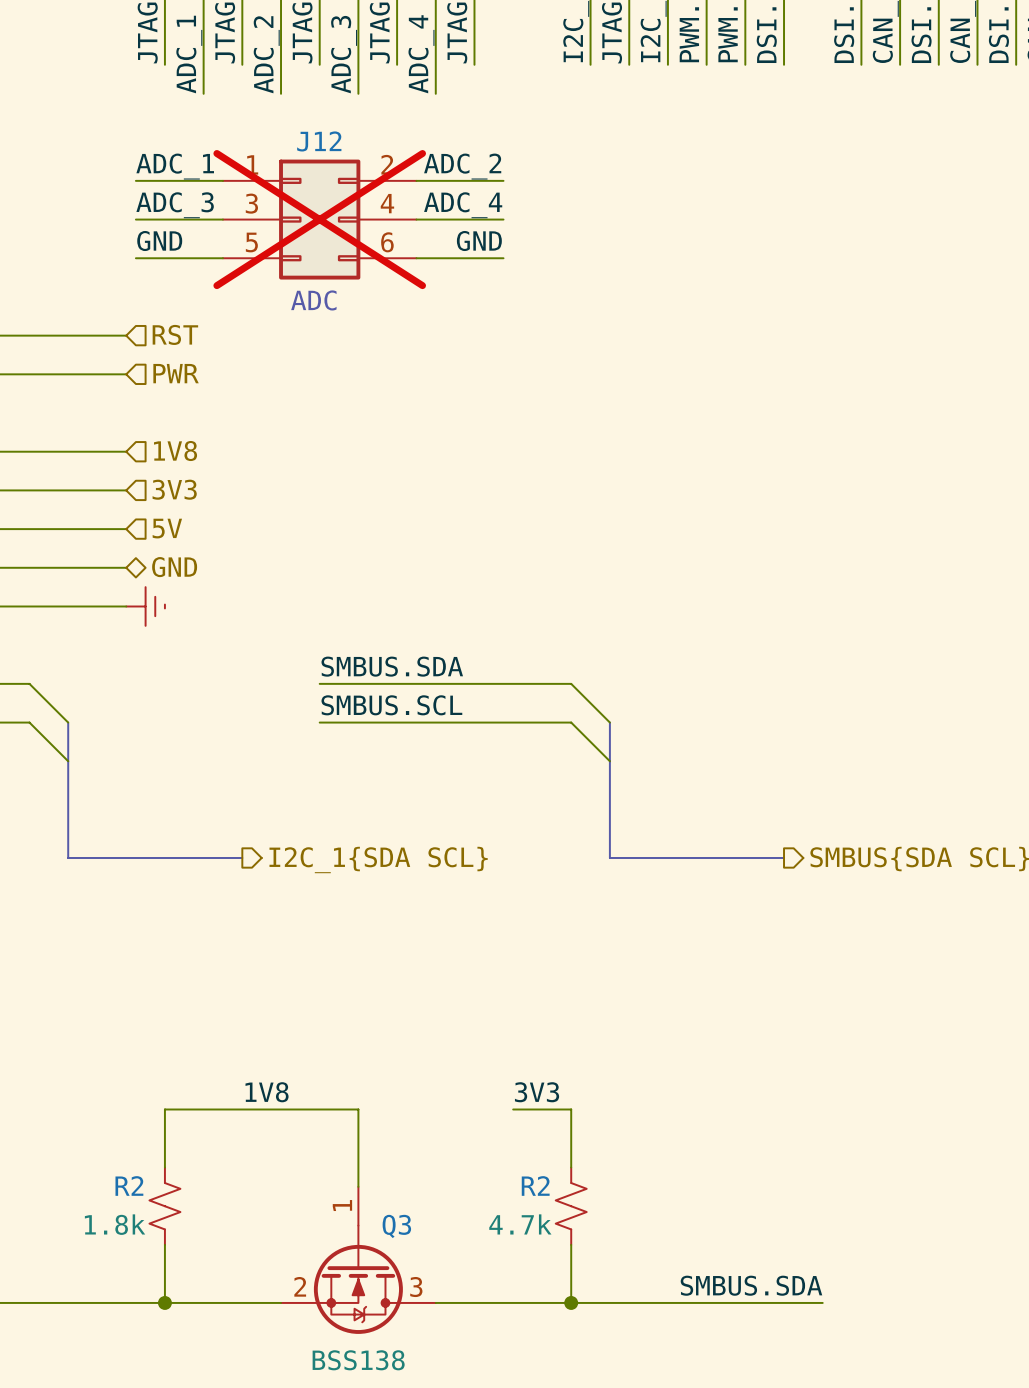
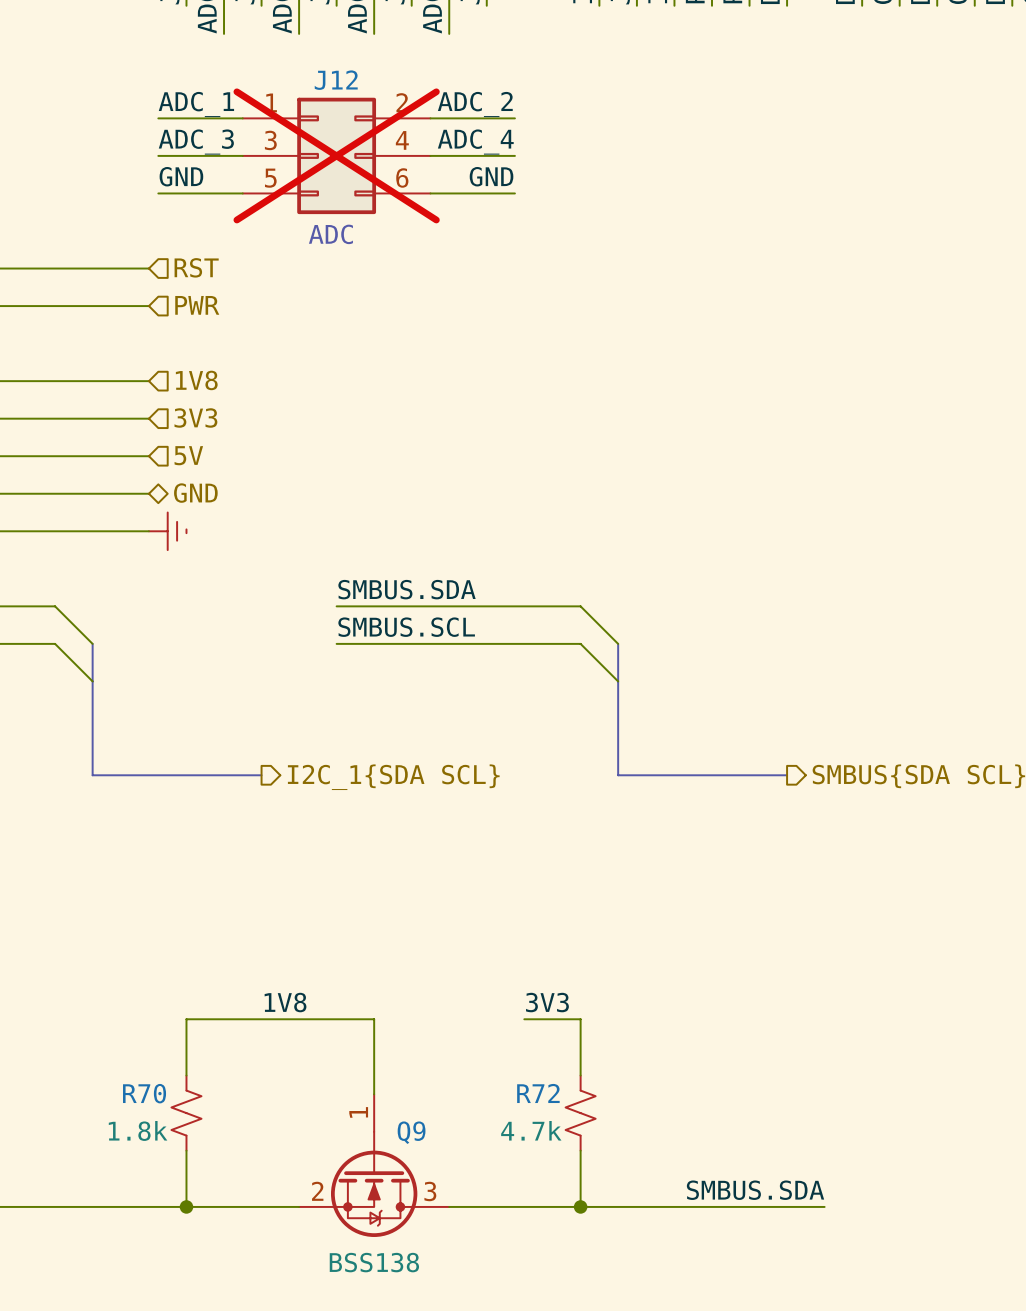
R2 name: R2 (129, 1185) -> R70 (144, 1093)
R2 name: R2 (535, 1185) -> R72 (538, 1093)
Q3 name: Q3 (396, 1226) -> Q9 (411, 1132)

